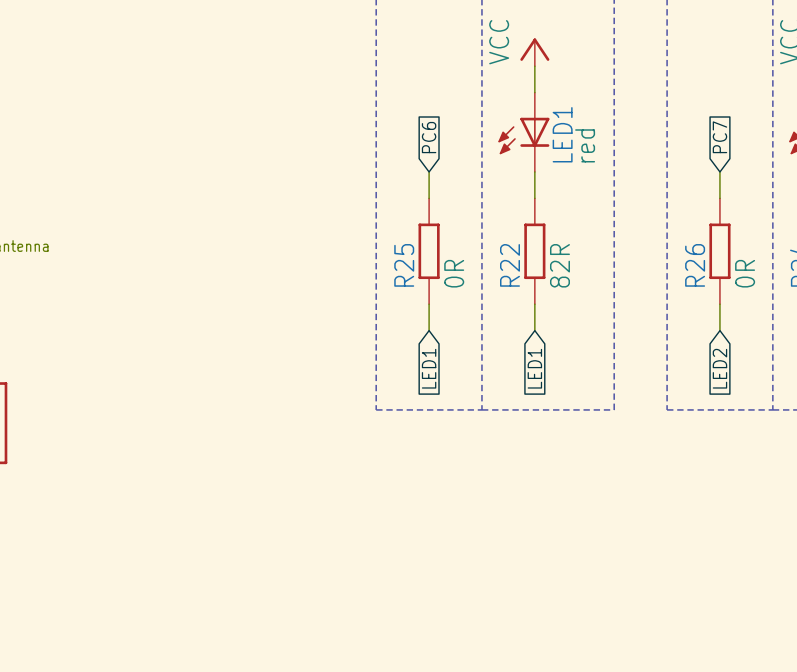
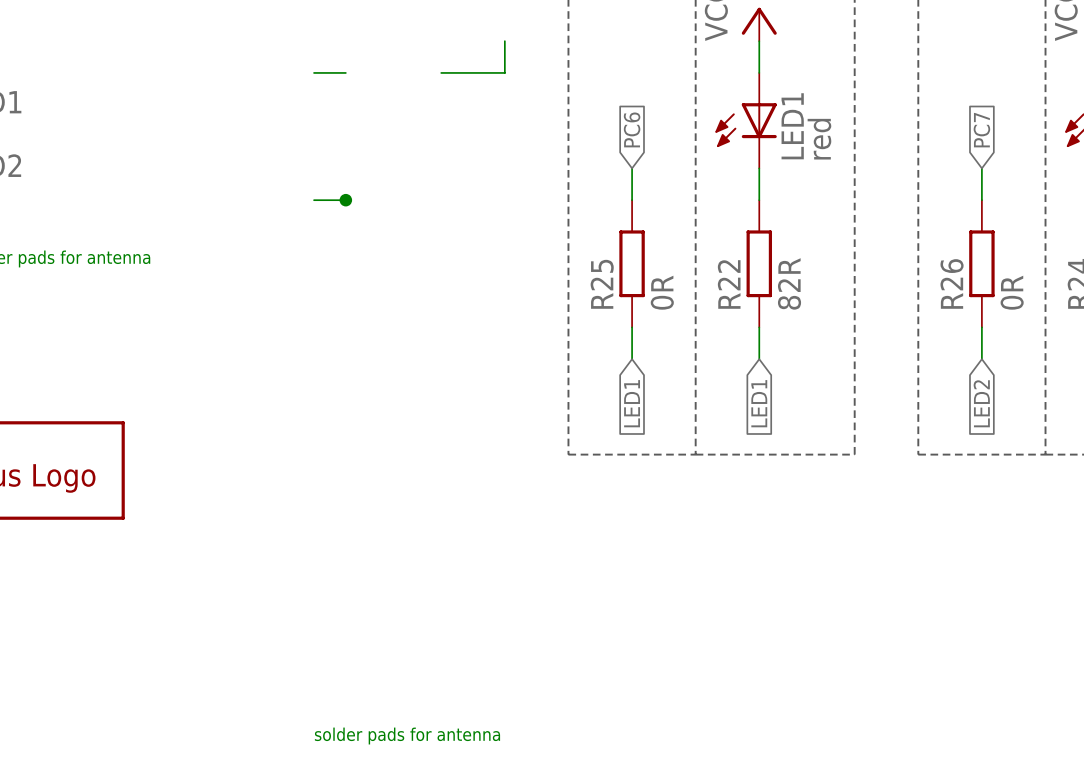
wire: none -> (504, 41) (504, 72) (441, 72)
wire: none -> (314, 72) (345, 72)
wire: none -> (314, 200) (345, 200)
junction: none -> (345, 200)
text: none -> solder pads for antenna (407, 736)

